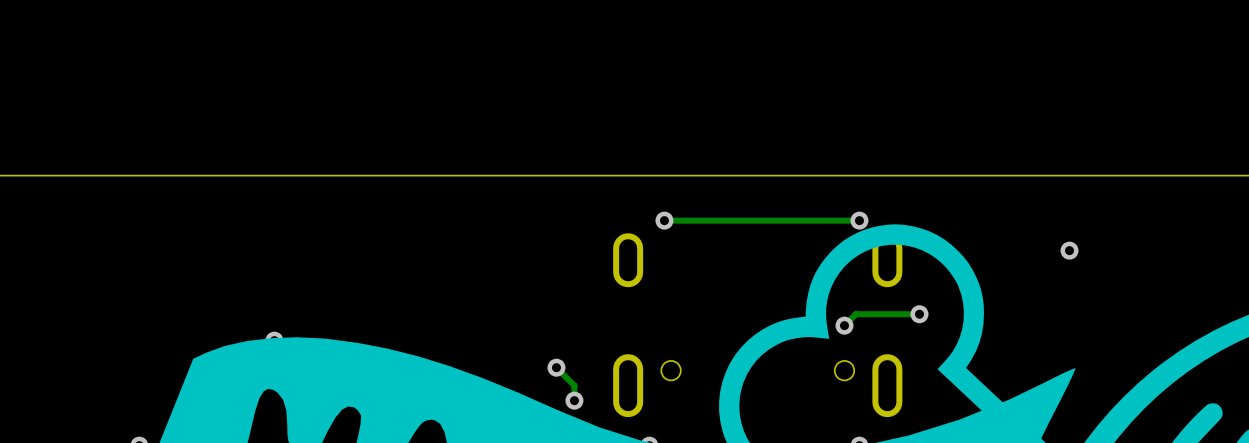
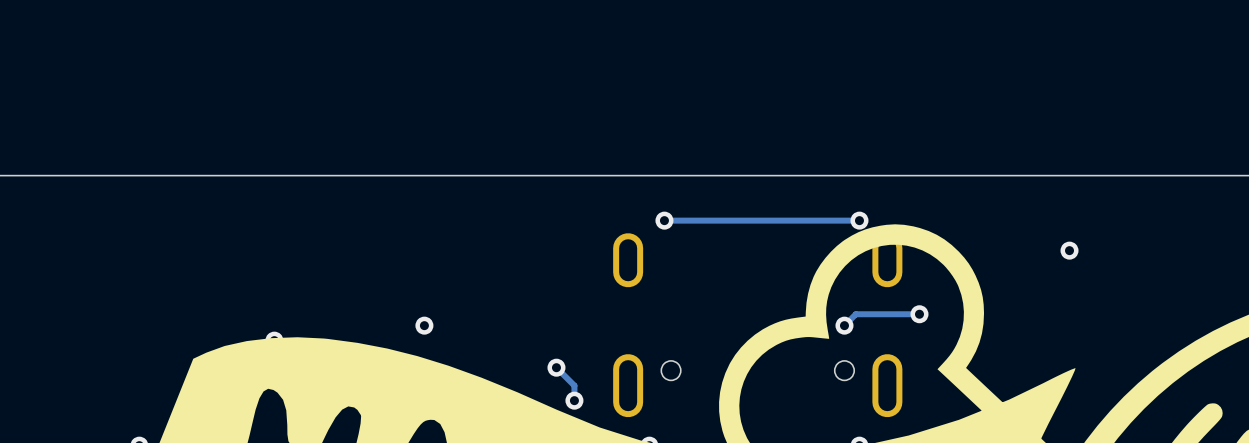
via: none -> (424, 325)

